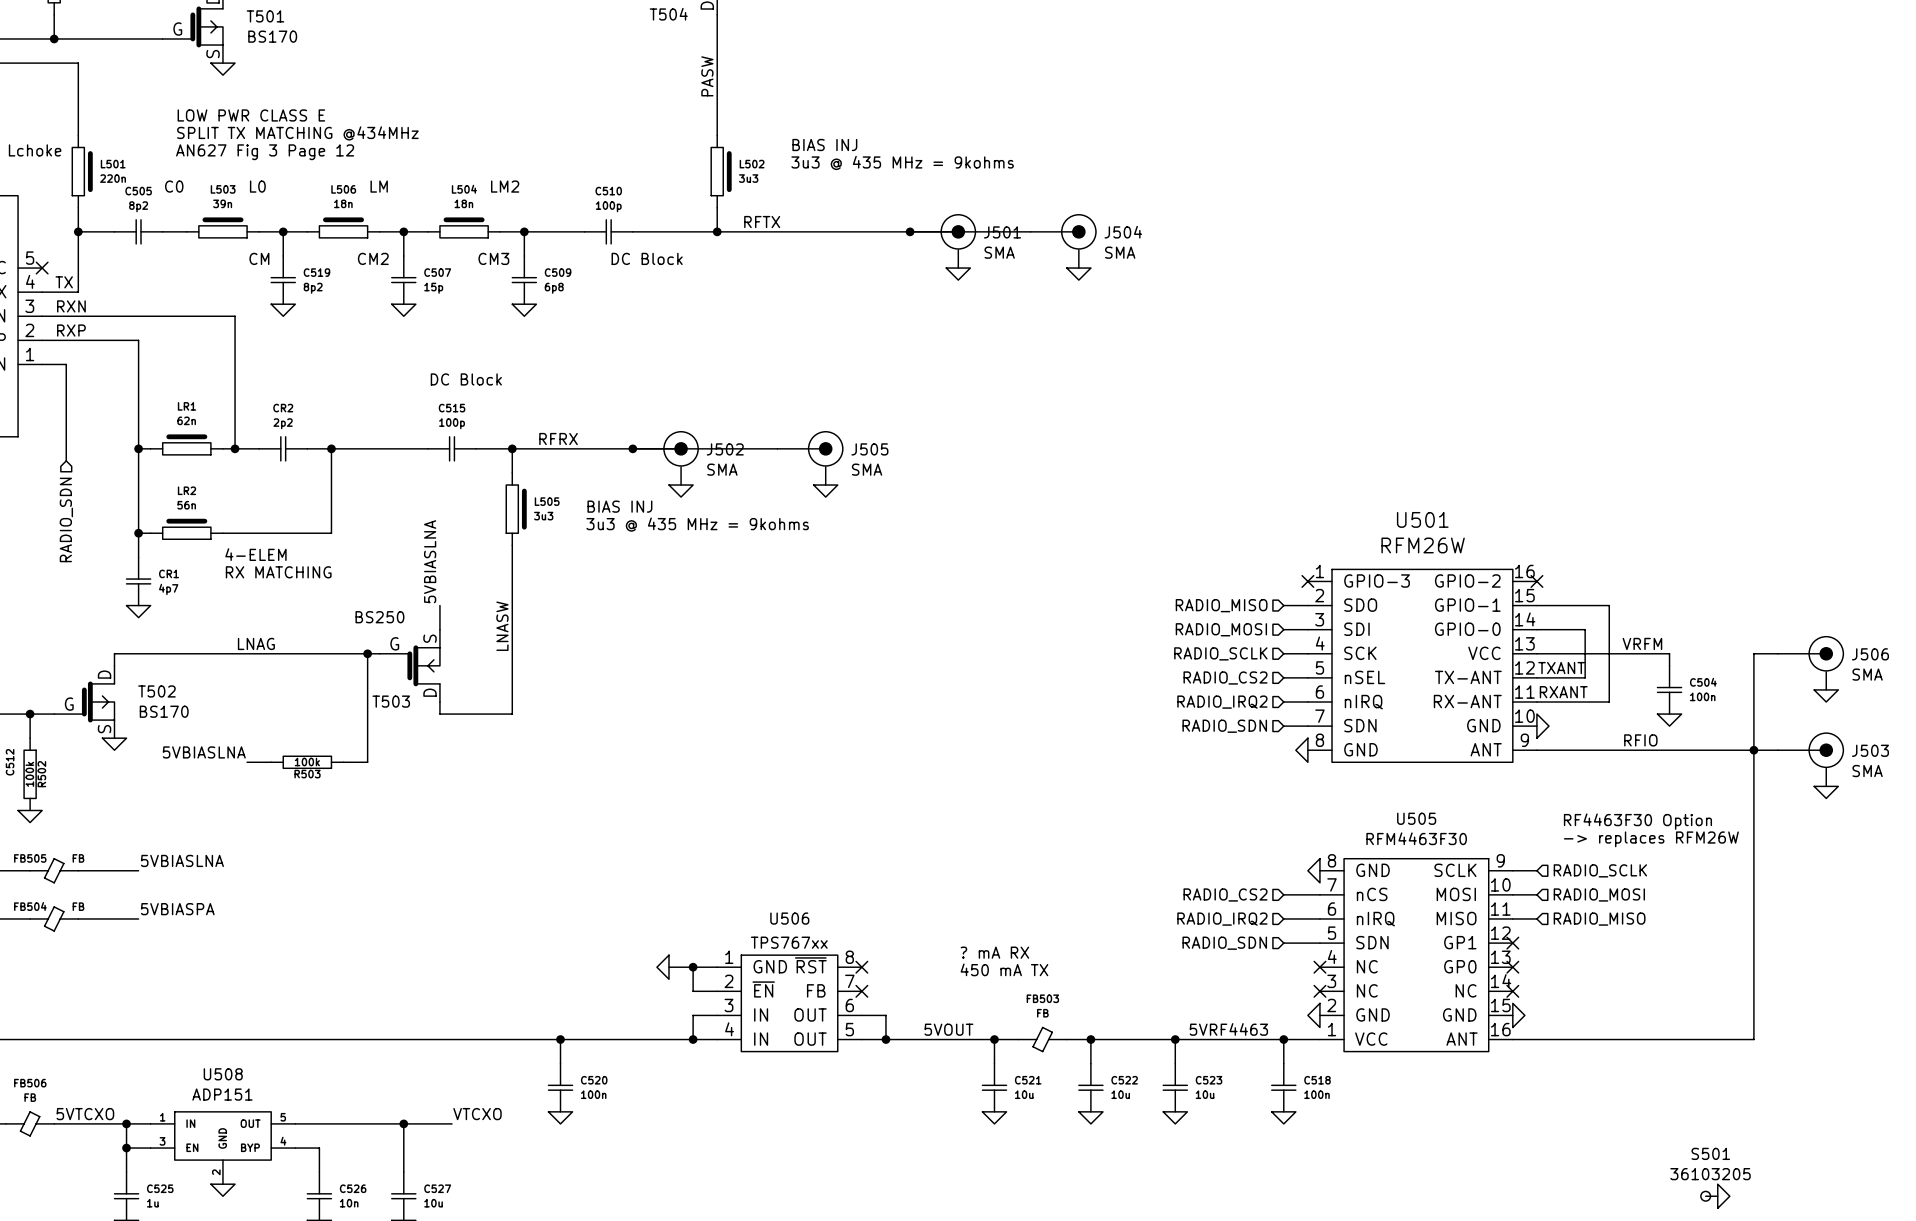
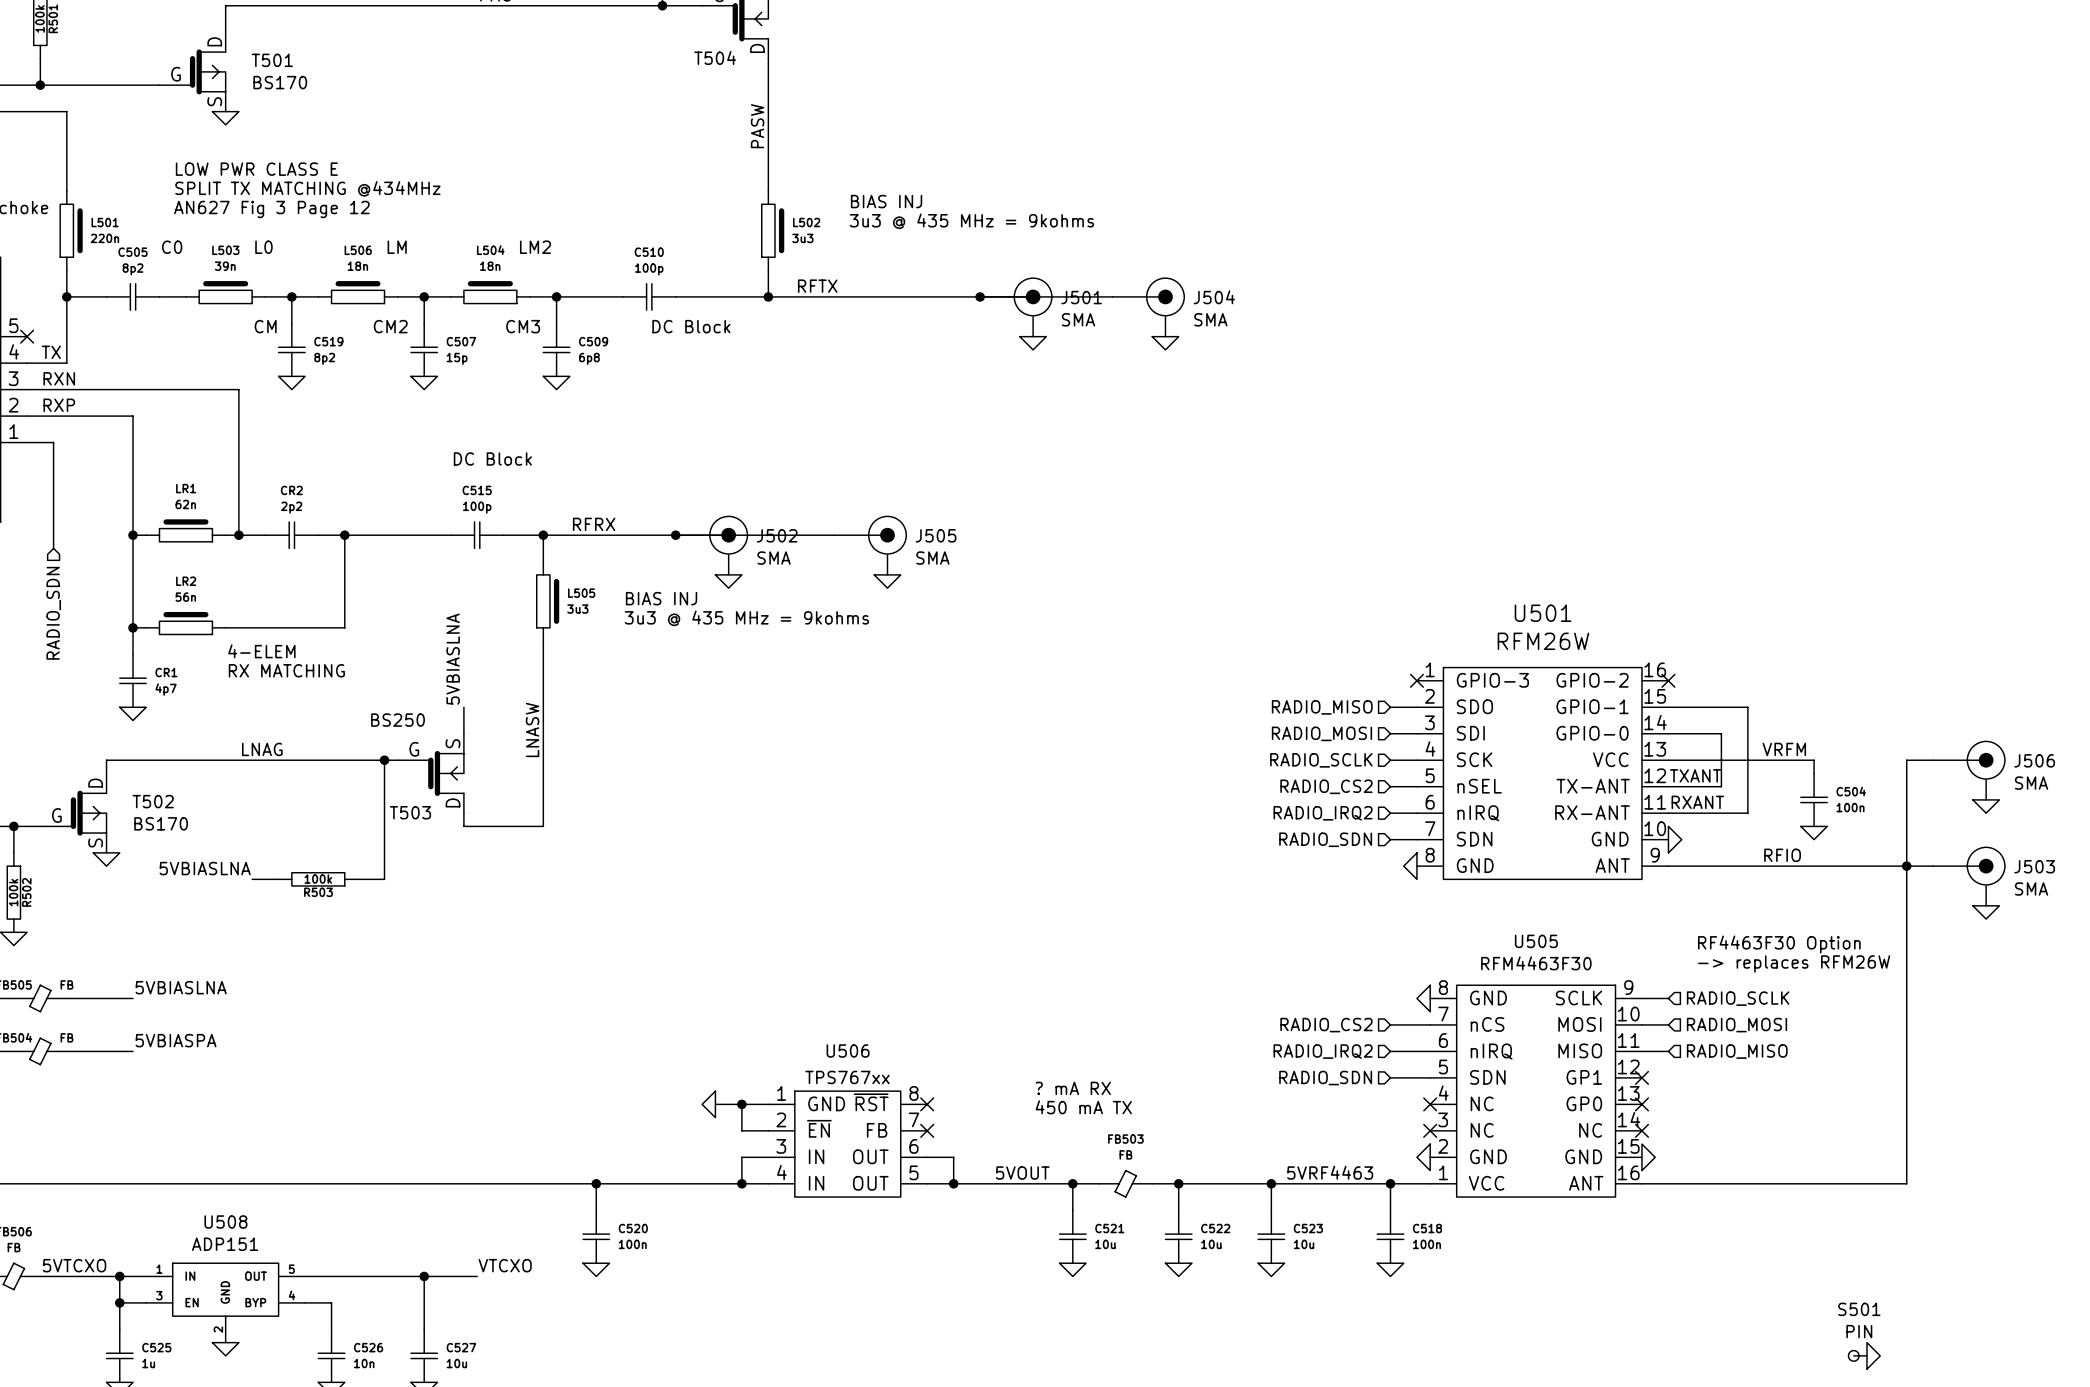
S501 value: 36103205 (1710, 1174) -> PIN (1859, 1331)

